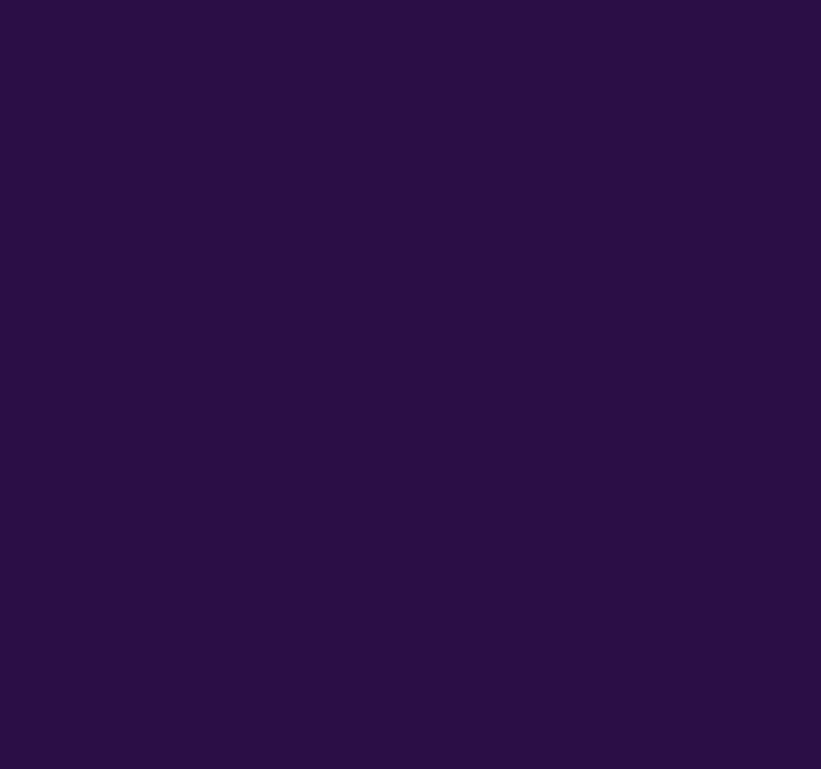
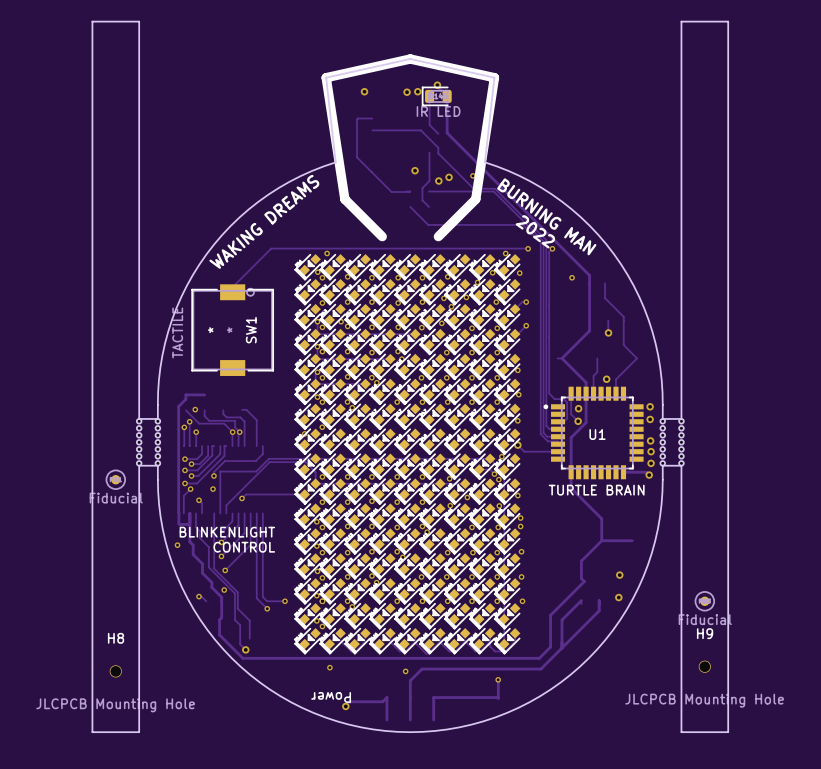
board edge: none -> (92, 21) (139, 21) (139, 418) (157, 418) (160, 367) (168, 331) (186, 285) (206, 254) (230, 225) (268, 194) (301, 175) (335, 162) (326, 77) (410, 59) (494, 77) (484, 162) (530, 181) (561, 201) (589, 225) (614, 254) (633, 285) (652, 331) (660, 367) (662, 418) (681, 418) (681, 21) (728, 21) (728, 732) (681, 732) (681, 465) (662, 465) (660, 516) (648, 564) (632, 598) (620, 619) (588, 658) (550, 689) (506, 712) (459, 727) (410, 732) (361, 727) (313, 712) (270, 689) (231, 658) (200, 619) (187, 598) (172, 564) (160, 516) (157, 465) (139, 465) (139, 732) (92, 732) (92, 21)
track: none -> (437, 85) (447, 96) (447, 133) (589, 275) (589, 330) (562, 358)
via: none -> (437, 85)
via: none -> (364, 91)
via: none -> (417, 91)
via: none -> (407, 92)
track: none -> (429, 96) (429, 125) (438, 133)
part: none -> IR LED (436, 96)
track: none -> (372, 118) (357, 119) (357, 157) (391, 192) (410, 191) (406, 191)
track: none -> (372, 130) (421, 130) (438, 147) (438, 153) (473, 188) (494, 188) (546, 240) (546, 425) (549, 429) (558, 429)
track: none -> (429, 152) (429, 181) (422, 188) (422, 200) (429, 206)
via: none -> (415, 170)
via: none -> (472, 175)
via: none -> (449, 177)
via: none -> (438, 181)
track: none -> (429, 191) (493, 191) (543, 241) (543, 432) (547, 436) (558, 436)
track: none -> (410, 206) (428, 224) (523, 224) (540, 242) (540, 434) (547, 441) (558, 441) (558, 444)
text: none -> BURNING MAN (546, 216)
text: none -> WAKING DREAMS (264, 221)
text: none -> 2022 (535, 231)
line: none -> (382, 236) (344, 199) (326, 77) (410, 59) (494, 77) (475, 199) (438, 236)
track: none -> (528, 248) (271, 248) (232, 287) (232, 292)
via: none -> (528, 248)
track: none -> (552, 248) (549, 252) (549, 393) (554, 399) (563, 399) (567, 402) (567, 418) (563, 421) (558, 421)
via: none -> (552, 248)
via: none -> (327, 253)
via: none -> (505, 253)
part: none -> (307, 267)
part: none -> (332, 267)
part: none -> (357, 267)
part: none -> (382, 267)
part: none -> (407, 267)
part: none -> (432, 267)
part: none -> (457, 267)
part: none -> (482, 267)
part: none -> (507, 267)
via: none -> (317, 272)
via: none -> (492, 272)
via: none -> (519, 273)
via: none -> (347, 276)
via: none -> (447, 276)
via: none -> (322, 277)
via: none -> (371, 277)
via: none -> (398, 277)
via: none -> (422, 277)
via: none -> (572, 277)
via: none -> (477, 282)
track: none -> (605, 283) (605, 298) (623, 316) (623, 345) (637, 358) (616, 379) (616, 393)
part: none -> (307, 292)
part: none -> (332, 292)
part: none -> (357, 292)
part: none -> (382, 292)
part: none -> (407, 292)
part: none -> (432, 292)
part: none -> (457, 292)
part: none -> (482, 292)
part: none -> (507, 292)
via: none -> (466, 297)
via: none -> (443, 298)
via: none -> (347, 302)
via: none -> (371, 302)
via: none -> (422, 302)
via: none -> (496, 302)
track: none -> (526, 302) (522, 302) (515, 309)
via: none -> (526, 302)
via: none -> (322, 303)
via: none -> (398, 303)
via: none -> (451, 306)
part: none -> (307, 316)
part: none -> (332, 316)
part: none -> (357, 316)
part: none -> (382, 316)
part: none -> (407, 316)
part: none -> (432, 316)
part: none -> (457, 316)
part: none -> (482, 316)
part: none -> (507, 316)
track: none -> (608, 320) (608, 332)
track: none -> (317, 321) (317, 332) (315, 334) (415, 334)
via: none -> (317, 321)
via: none -> (341, 321)
via: none -> (441, 323)
track: none -> (526, 325) (517, 334) (515, 334)
via: none -> (526, 325)
via: none -> (347, 326)
via: none -> (322, 327)
via: none -> (371, 327)
via: none -> (398, 327)
via: none -> (421, 327)
via: none -> (472, 328)
via: none -> (497, 328)
SW1: none -> TACTILE (232, 330)
via: none -> (608, 332)
part: none -> (307, 341)
part: none -> (332, 341)
part: none -> (357, 341)
part: none -> (382, 341)
part: none -> (407, 341)
part: none -> (432, 341)
part: none -> (457, 341)
part: none -> (482, 341)
part: none -> (507, 341)
track: none -> (317, 346) (317, 357) (315, 359) (390, 359)
via: none -> (317, 346)
via: none -> (322, 351)
via: none -> (347, 351)
via: none -> (398, 351)
via: none -> (371, 352)
via: none -> (446, 352)
via: none -> (472, 352)
via: none -> (497, 352)
track: none -> (557, 358) (562, 358)
track: none -> (562, 358) (586, 382) (586, 422) (571, 437) (571, 488) (601, 518) (601, 540)
track: none -> (597, 358) (597, 372) (593, 375) (593, 393)
via: none -> (401, 359)
part: none -> (307, 366)
part: none -> (332, 366)
part: none -> (357, 366)
part: none -> (382, 366)
part: none -> (407, 366)
part: none -> (432, 366)
part: none -> (457, 366)
part: none -> (482, 366)
part: none -> (507, 366)
via: none -> (517, 370)
track: none -> (317, 372) (315, 374) (315, 384) (365, 384)
via: none -> (317, 372)
via: none -> (347, 376)
via: none -> (322, 377)
via: none -> (371, 377)
via: none -> (421, 377)
via: none -> (446, 377)
via: none -> (472, 377)
via: none -> (497, 377)
via: none -> (606, 379)
via: none -> (376, 382)
part: none -> (307, 391)
part: none -> (332, 391)
part: none -> (357, 391)
part: none -> (382, 391)
part: none -> (407, 391)
part: none -> (432, 391)
part: none -> (457, 391)
part: none -> (482, 391)
part: none -> (507, 391)
track: none -> (571, 393) (571, 414) (578, 421)
track: none -> (204, 394) (185, 394) (185, 399) (178, 406) (178, 523) (188, 524) (189, 522)
via: none -> (518, 394)
via: none -> (317, 397)
via: none -> (347, 401)
via: none -> (322, 402)
via: none -> (397, 402)
via: none -> (422, 402)
via: none -> (447, 402)
via: none -> (472, 402)
via: none -> (497, 402)
via: none -> (650, 406)
via: none -> (352, 407)
via: none -> (578, 408)
via: none -> (195, 409)
track: none -> (242, 409) (246, 409) (256, 420) (256, 446)
track: none -> (185, 410) (199, 423) (224, 423) (232, 432) (232, 446)
track: none -> (204, 410) (204, 416) (209, 420) (235, 420) (235, 427) (239, 432) (238, 446)
track: none -> (223, 410) (223, 414) (226, 417) (240, 417) (244, 421) (244, 446)
part: none -> (307, 416)
part: none -> (332, 416)
part: none -> (357, 416)
part: none -> (382, 416)
part: none -> (407, 416)
part: none -> (432, 416)
part: none -> (457, 416)
part: none -> (482, 416)
part: none -> (507, 416)
via: none -> (650, 419)
via: none -> (517, 420)
track: none -> (189, 421) (189, 446)
via: none -> (189, 421)
via: none -> (578, 421)
track: none -> (184, 427) (183, 446)
via: none -> (184, 427)
via: none -> (322, 427)
track: none -> (196, 432) (195, 446)
via: none -> (196, 432)
via: none -> (232, 432)
via: none -> (239, 432)
U1: none -> (593, 432)
via: none -> (304, 433)
via: none -> (650, 440)
part: none -> (307, 441)
part: none -> (332, 441)
part: none -> (357, 441)
part: none -> (382, 441)
part: none -> (407, 441)
part: none -> (432, 441)
part: none -> (457, 441)
part: none -> (482, 441)
part: none -> (507, 441)
part: none -> (148, 442)
part: none -> (672, 442)
track: none -> (517, 445) (524, 451) (558, 451)
via: none -> (517, 445)
track: none -> (202, 446) (202, 454) (196, 459) (184, 459)
track: none -> (208, 446) (208, 455) (199, 464) (191, 464)
track: none -> (214, 446) (212, 446) (212, 455) (197, 470) (184, 470)
track: none -> (220, 446) (220, 454) (198, 475) (191, 475)
track: none -> (226, 446) (224, 446) (224, 455) (196, 483) (184, 483)
track: none -> (262, 446) (262, 454) (255, 461) (224, 461) (213, 472) (213, 475)
via: none -> (651, 451)
via: none -> (501, 456)
via: none -> (184, 459)
via: none -> (651, 463)
via: none -> (191, 464)
part: none -> (307, 466)
part: none -> (332, 466)
part: none -> (357, 466)
part: none -> (382, 466)
part: none -> (407, 466)
part: none -> (432, 466)
part: none -> (457, 466)
part: none -> (482, 466)
part: none -> (507, 466)
track: none -> (479, 469) (489, 469) (494, 474)
via: none -> (184, 470)
track: none -> (623, 472) (646, 472) (649, 475)
via: none -> (494, 474)
via: none -> (191, 475)
via: none -> (213, 475)
via: none -> (649, 475)
via: none -> (322, 476)
via: none -> (347, 476)
via: none -> (371, 476)
via: none -> (397, 476)
via: none -> (422, 476)
via: none -> (449, 478)
part: none -> Fiducial (115, 479)
via: none -> (498, 479)
via: none -> (184, 483)
track: none -> (465, 483) (315, 483) (315, 472) (305, 462) (269, 462) (226, 505) (226, 513)
track: none -> (190, 489) (183, 495) (183, 513)
via: none -> (190, 489)
via: none -> (213, 489)
text: none -> TURTLE BRAIN (596, 490)
part: none -> (307, 491)
part: none -> (332, 491)
part: none -> (357, 491)
part: none -> (382, 491)
part: none -> (407, 491)
part: none -> (432, 491)
part: none -> (457, 491)
part: none -> (482, 491)
part: none -> (507, 491)
track: none -> (304, 494) (245, 494) (242, 498)
via: none -> (517, 495)
via: none -> (467, 497)
via: none -> (242, 498)
track: none -> (199, 500) (202, 503) (202, 513)
via: none -> (199, 500)
via: none -> (371, 501)
via: none -> (322, 502)
via: none -> (347, 502)
via: none -> (397, 502)
via: none -> (422, 502)
via: none -> (450, 505)
via: none -> (499, 505)
track: none -> (189, 513) (189, 541) (193, 545) (193, 554) (202, 563) (202, 573) (211, 582) (211, 587) (221, 597) (219, 635) (242, 658) (539, 658) (550, 647) (550, 615) (584, 581)
track: none -> (195, 513) (195, 527) (199, 531) (199, 538) (208, 547) (208, 567) (235, 593) (235, 619) (240, 625) (240, 644) (245, 649)
track: none -> (214, 513) (214, 568) (237, 592) (237, 608) (249, 620) (249, 638)
track: none -> (220, 513) (220, 471) (256, 471) (268, 458) (490, 458) (500, 469) (504, 469) (504, 644)
track: none -> (232, 513) (232, 521) (221, 530)
track: none -> (238, 513) (238, 525) (221, 542)
track: none -> (244, 513) (244, 533) (221, 556)
track: none -> (250, 513) (250, 544) (225, 570)
track: none -> (256, 513) (256, 598) (267, 608)
track: none -> (262, 513) (262, 597) (267, 601) (285, 601)
part: none -> (307, 516)
part: none -> (332, 516)
part: none -> (357, 516)
part: none -> (382, 516)
part: none -> (407, 516)
part: none -> (432, 516)
part: none -> (457, 516)
part: none -> (482, 516)
part: none -> (507, 516)
via: none -> (520, 518)
via: none -> (316, 521)
via: none -> (347, 526)
via: none -> (371, 526)
via: none -> (422, 526)
via: none -> (520, 526)
via: none -> (322, 527)
via: none -> (397, 527)
via: none -> (472, 527)
via: none -> (498, 527)
text: none -> BLINKENLIGHT (227, 532)
via: none -> (427, 532)
track: none -> (601, 540) (581, 561) (581, 578) (584, 581)
track: none -> (601, 540) (632, 540)
part: none -> (307, 541)
part: none -> (332, 541)
part: none -> (357, 541)
part: none -> (382, 541)
part: none -> (407, 541)
part: none -> (432, 541)
part: none -> (457, 541)
part: none -> (482, 541)
part: none -> (507, 541)
via: none -> (221, 542)
via: none -> (177, 545)
via: none -> (316, 546)
text: none -> CONTROL (244, 547)
via: none -> (371, 551)
via: none -> (397, 551)
via: none -> (521, 551)
via: none -> (322, 552)
via: none -> (347, 552)
via: none -> (447, 552)
via: none -> (472, 552)
via: none -> (497, 552)
via: none -> (221, 556)
via: none -> (402, 557)
part: none -> (307, 566)
part: none -> (332, 566)
part: none -> (357, 566)
part: none -> (382, 566)
part: none -> (407, 566)
part: none -> (432, 566)
part: none -> (457, 566)
part: none -> (482, 566)
part: none -> (507, 566)
via: none -> (225, 570)
via: none -> (317, 571)
via: none -> (619, 575)
via: none -> (347, 576)
via: none -> (371, 576)
via: none -> (421, 576)
via: none -> (446, 576)
via: none -> (472, 576)
via: none -> (497, 576)
via: none -> (521, 576)
via: none -> (322, 577)
via: none -> (376, 582)
via: none -> (224, 590)
part: none -> (307, 591)
part: none -> (332, 591)
part: none -> (357, 591)
part: none -> (382, 591)
part: none -> (407, 591)
part: none -> (432, 591)
part: none -> (457, 591)
part: none -> (482, 591)
part: none -> (507, 591)
via: none -> (316, 595)
track: none -> (199, 596) (206, 601)
via: none -> (199, 596)
via: none -> (618, 597)
via: none -> (285, 601)
via: none -> (322, 601)
via: none -> (347, 601)
via: none -> (397, 601)
via: none -> (422, 601)
via: none -> (447, 601)
via: none -> (472, 601)
via: none -> (497, 601)
via: none -> (522, 601)
part: none -> Fiducial (704, 601)
track: none -> (581, 604) (581, 600) (562, 619) (562, 648)
track: none -> (599, 604) (599, 600) (599, 610) (540, 669) (422, 669) (410, 680) (410, 720)
via: none -> (352, 606)
via: none -> (267, 608)
part: none -> (307, 616)
part: none -> (332, 616)
part: none -> (357, 616)
part: none -> (382, 616)
part: none -> (407, 616)
part: none -> (432, 616)
part: none -> (457, 616)
part: none -> (482, 616)
part: none -> (507, 616)
via: none -> (316, 620)
via: none -> (322, 626)
track: none -> (390, 633) (390, 642) (399, 651) (405, 651) (415, 641)
track: none -> (415, 633) (415, 642) (426, 653) (440, 641)
track: none -> (440, 633) (440, 642) (449, 651) (455, 651) (465, 641) (475, 651) (480, 651) (490, 641)
track: none -> (490, 633) (490, 646) (495, 651) (505, 651) (515, 641) (515, 633)
track: none -> (340, 640) (351, 651) (355, 651) (365, 641)
part: none -> (307, 641)
part: none -> (332, 641)
part: none -> (357, 641)
part: none -> (382, 641)
part: none -> (407, 641)
part: none -> (432, 641)
part: none -> (457, 641)
part: none -> (482, 641)
part: none -> (507, 641)
via: none -> (245, 649)
H9: none -> JLCPCB Mounting Hole (704, 666)
via: none -> (329, 667)
H8: none -> JLCPCB Mounting Hole (115, 671)
via: none -> (405, 671)
track: none -> (498, 679) (498, 698) (433, 697) (433, 720)
via: none -> (498, 679)
text: none -> Power (331, 697)
track: none -> (345, 706) (350, 701) (382, 701) (386, 697) (386, 720)
via: none -> (345, 706)

